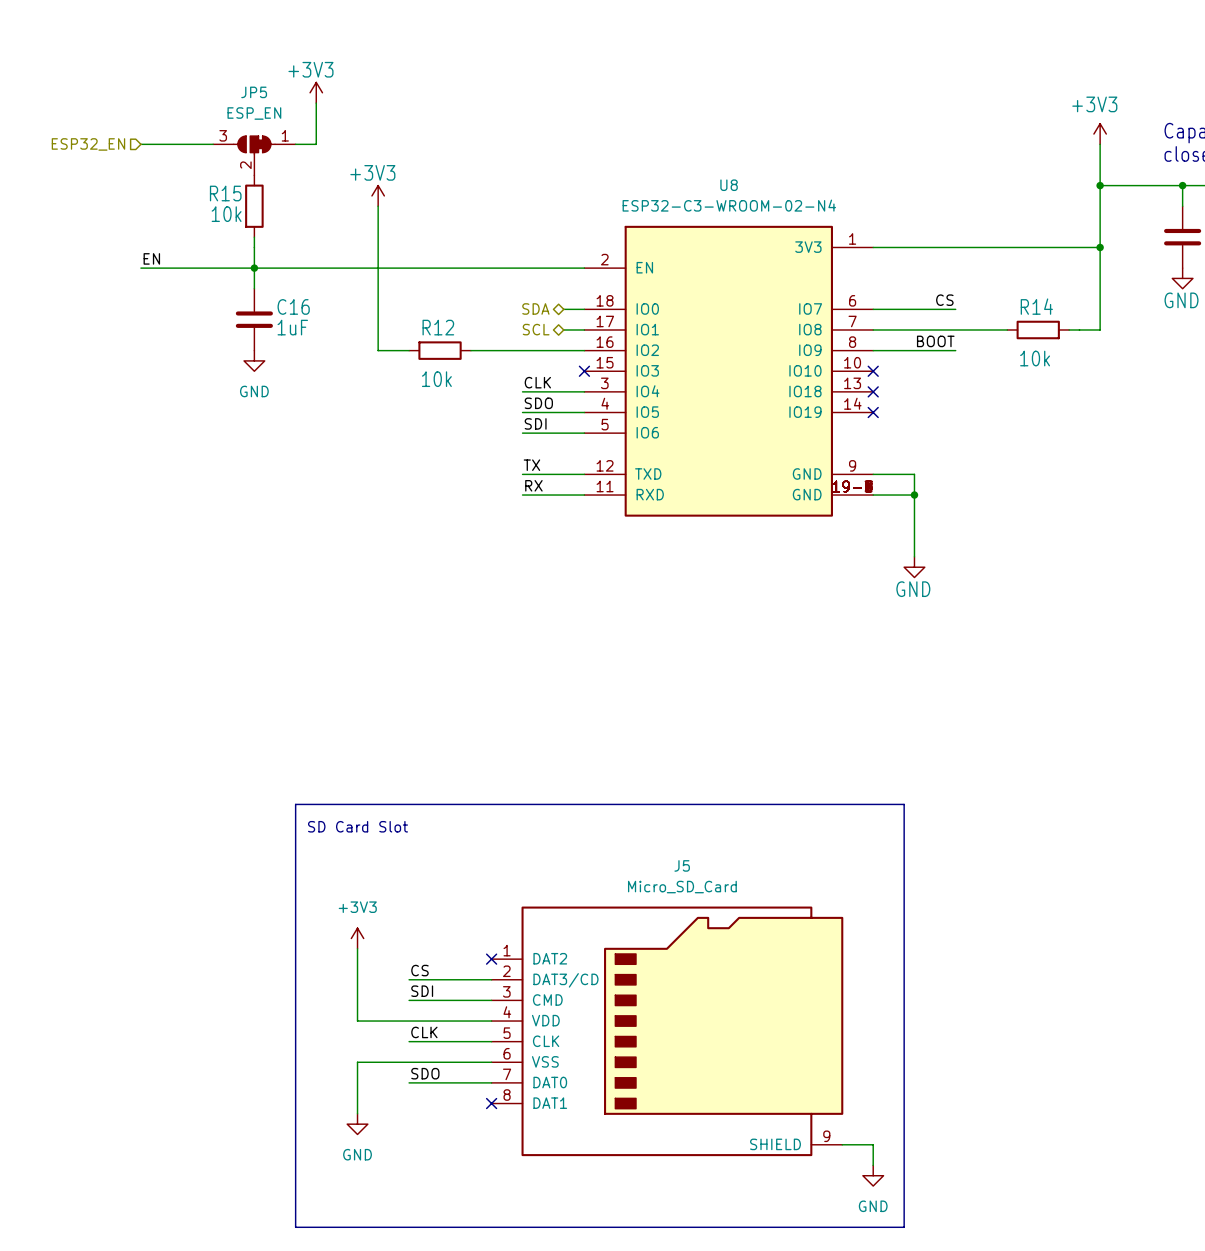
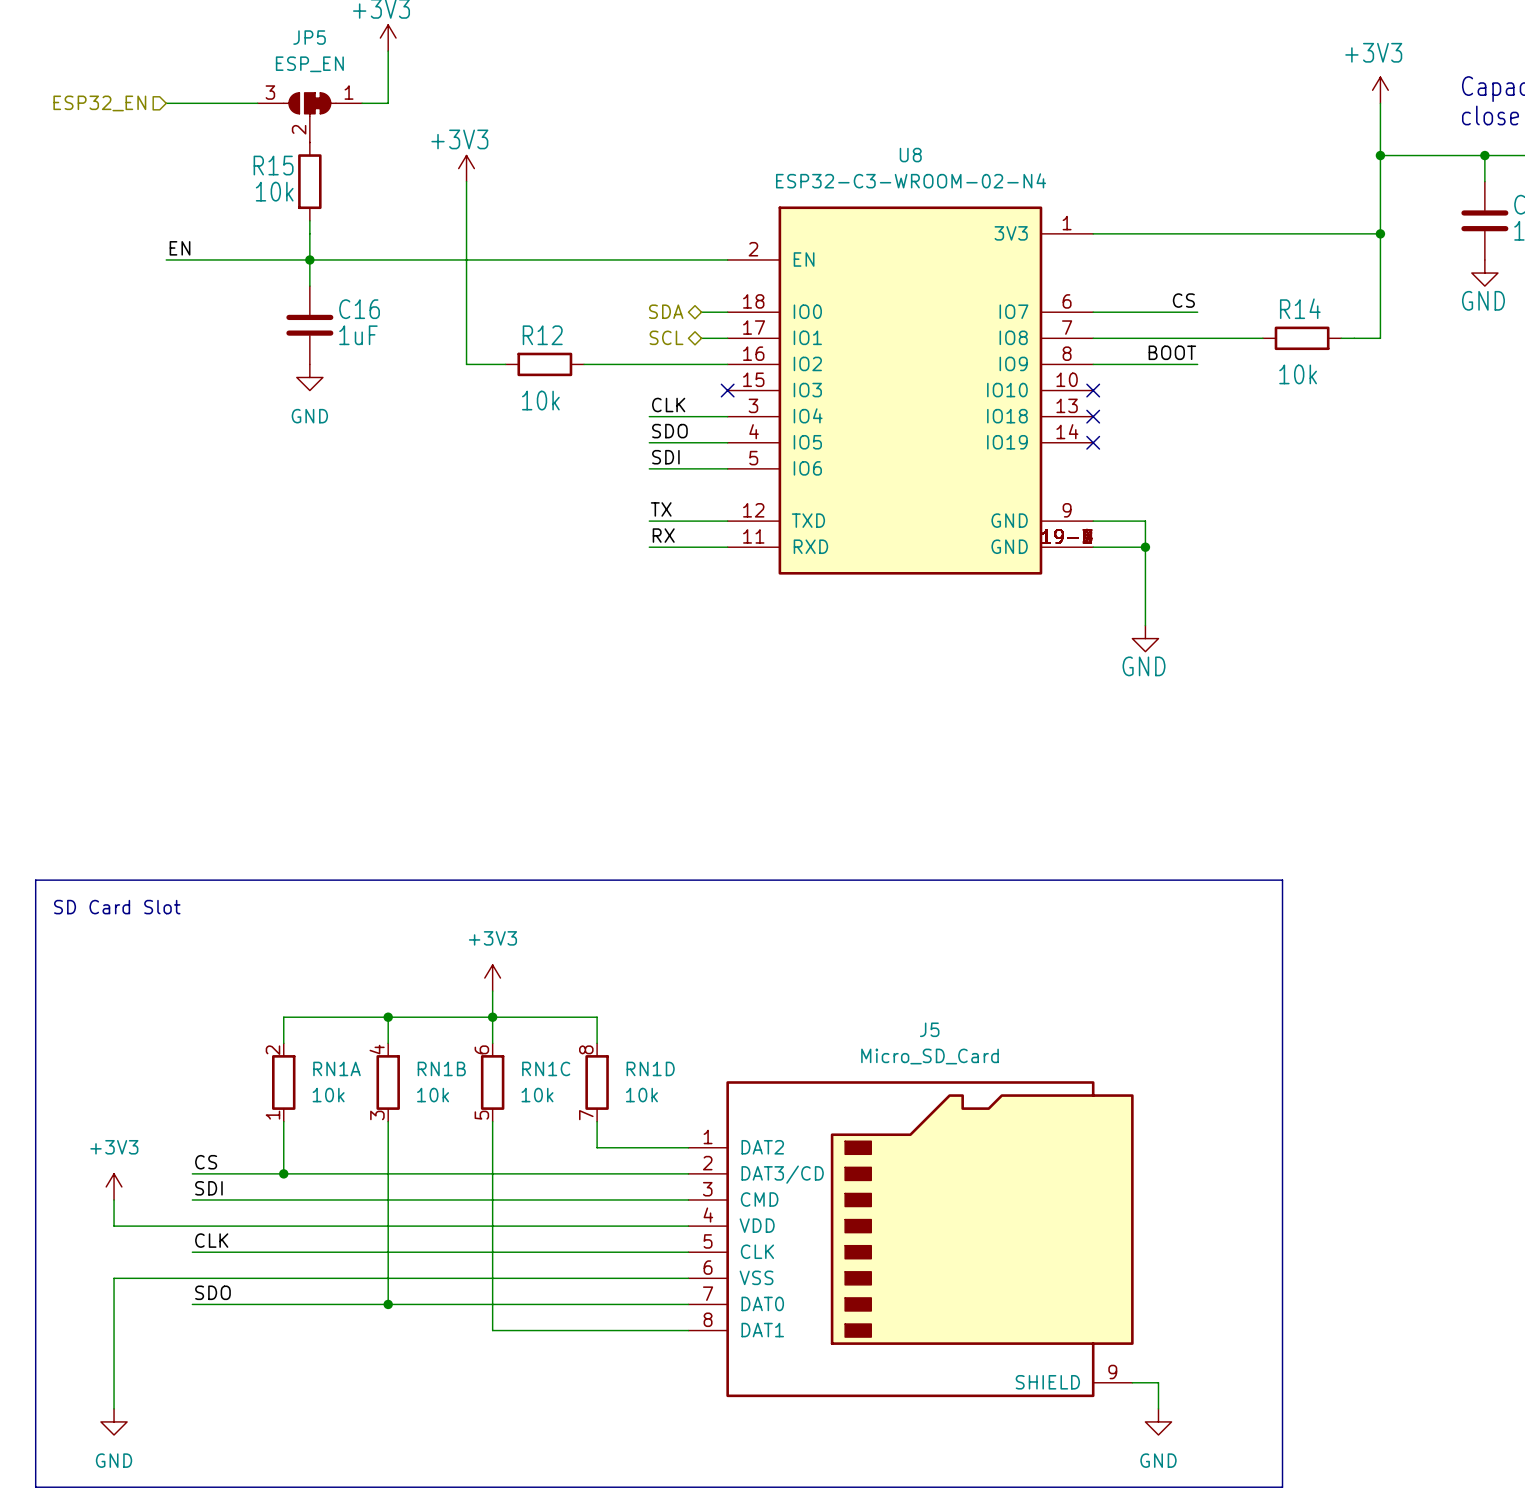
text: none -> SD Card Slot (117, 907)
line: (295, 804) (904, 804) (904, 1227) (295, 1227) (295, 804) -> (35, 880) (35, 1487) (1282, 1487) (1282, 880) (35, 880)
text: SD Card Slot (358, 826) -> none
wire: none -> (492, 991) (492, 1043)
wire: none -> (388, 1017) (388, 1043)
junction: none -> (388, 1017)
junction: none -> (492, 1017)
wire: none -> (283, 1043) (283, 1017) (597, 1017) (597, 1043)
RN1A: none -> 10k (283, 1082)
RN1B: none -> 10k (388, 1082)
RN1C: none -> 10k (492, 1082)
RN1D: none -> 10k (597, 1082)
power symbol position: +3V3 (357, 938) -> +3V3 (492, 978)
wire: none -> (283, 1121) (283, 1173)
wire: none -> (388, 1121) (388, 1304)
wire: (357, 948) (357, 1021) (491, 1021) -> none
wire: none -> (492, 1121) (492, 1330) (688, 1330)
wire: none -> (597, 1121) (597, 1147) (688, 1147)
no-connect mark: (491, 959) -> none
label: CS (419, 970) -> none
wire: (409, 979) (491, 979) -> none
label: none -> CS (206, 1162)
wire: none -> (192, 1173) (688, 1173)
junction: none -> (283, 1173)
label: SDI (422, 991) -> none
power symbol: none -> +3V3 (114, 1186)
wire: (409, 1000) (491, 1000) -> none
label: none -> SDI (208, 1188)
wire: none -> (114, 1199) (114, 1226) (688, 1226)
wire: none -> (192, 1199) (688, 1199)
J5 position: (667, 1031) -> (911, 1239)
label: CLK (424, 1032) -> none
wire: (409, 1041) (491, 1041) -> none
label: none -> CLK (211, 1240)
wire: none -> (192, 1252) (688, 1252)
wire: (491, 1062) (357, 1062) (357, 1113) -> none
wire: none -> (688, 1278) (114, 1278) (114, 1408)
label: SDO (425, 1073) -> none
wire: (409, 1082) (491, 1082) -> none
label: none -> SDO (212, 1292)
wire: none -> (192, 1304) (688, 1304)
junction: none -> (388, 1304)
no-connect mark: (491, 1103) -> none
power symbol: GND (357, 1124) -> none
wire: (842, 1144) (873, 1144) (873, 1165) -> none
wire: none -> (1132, 1382) (1158, 1382) (1158, 1408)
power symbol position: GND (873, 1175) -> GND (1158, 1421)
power symbol: none -> GND (114, 1421)

